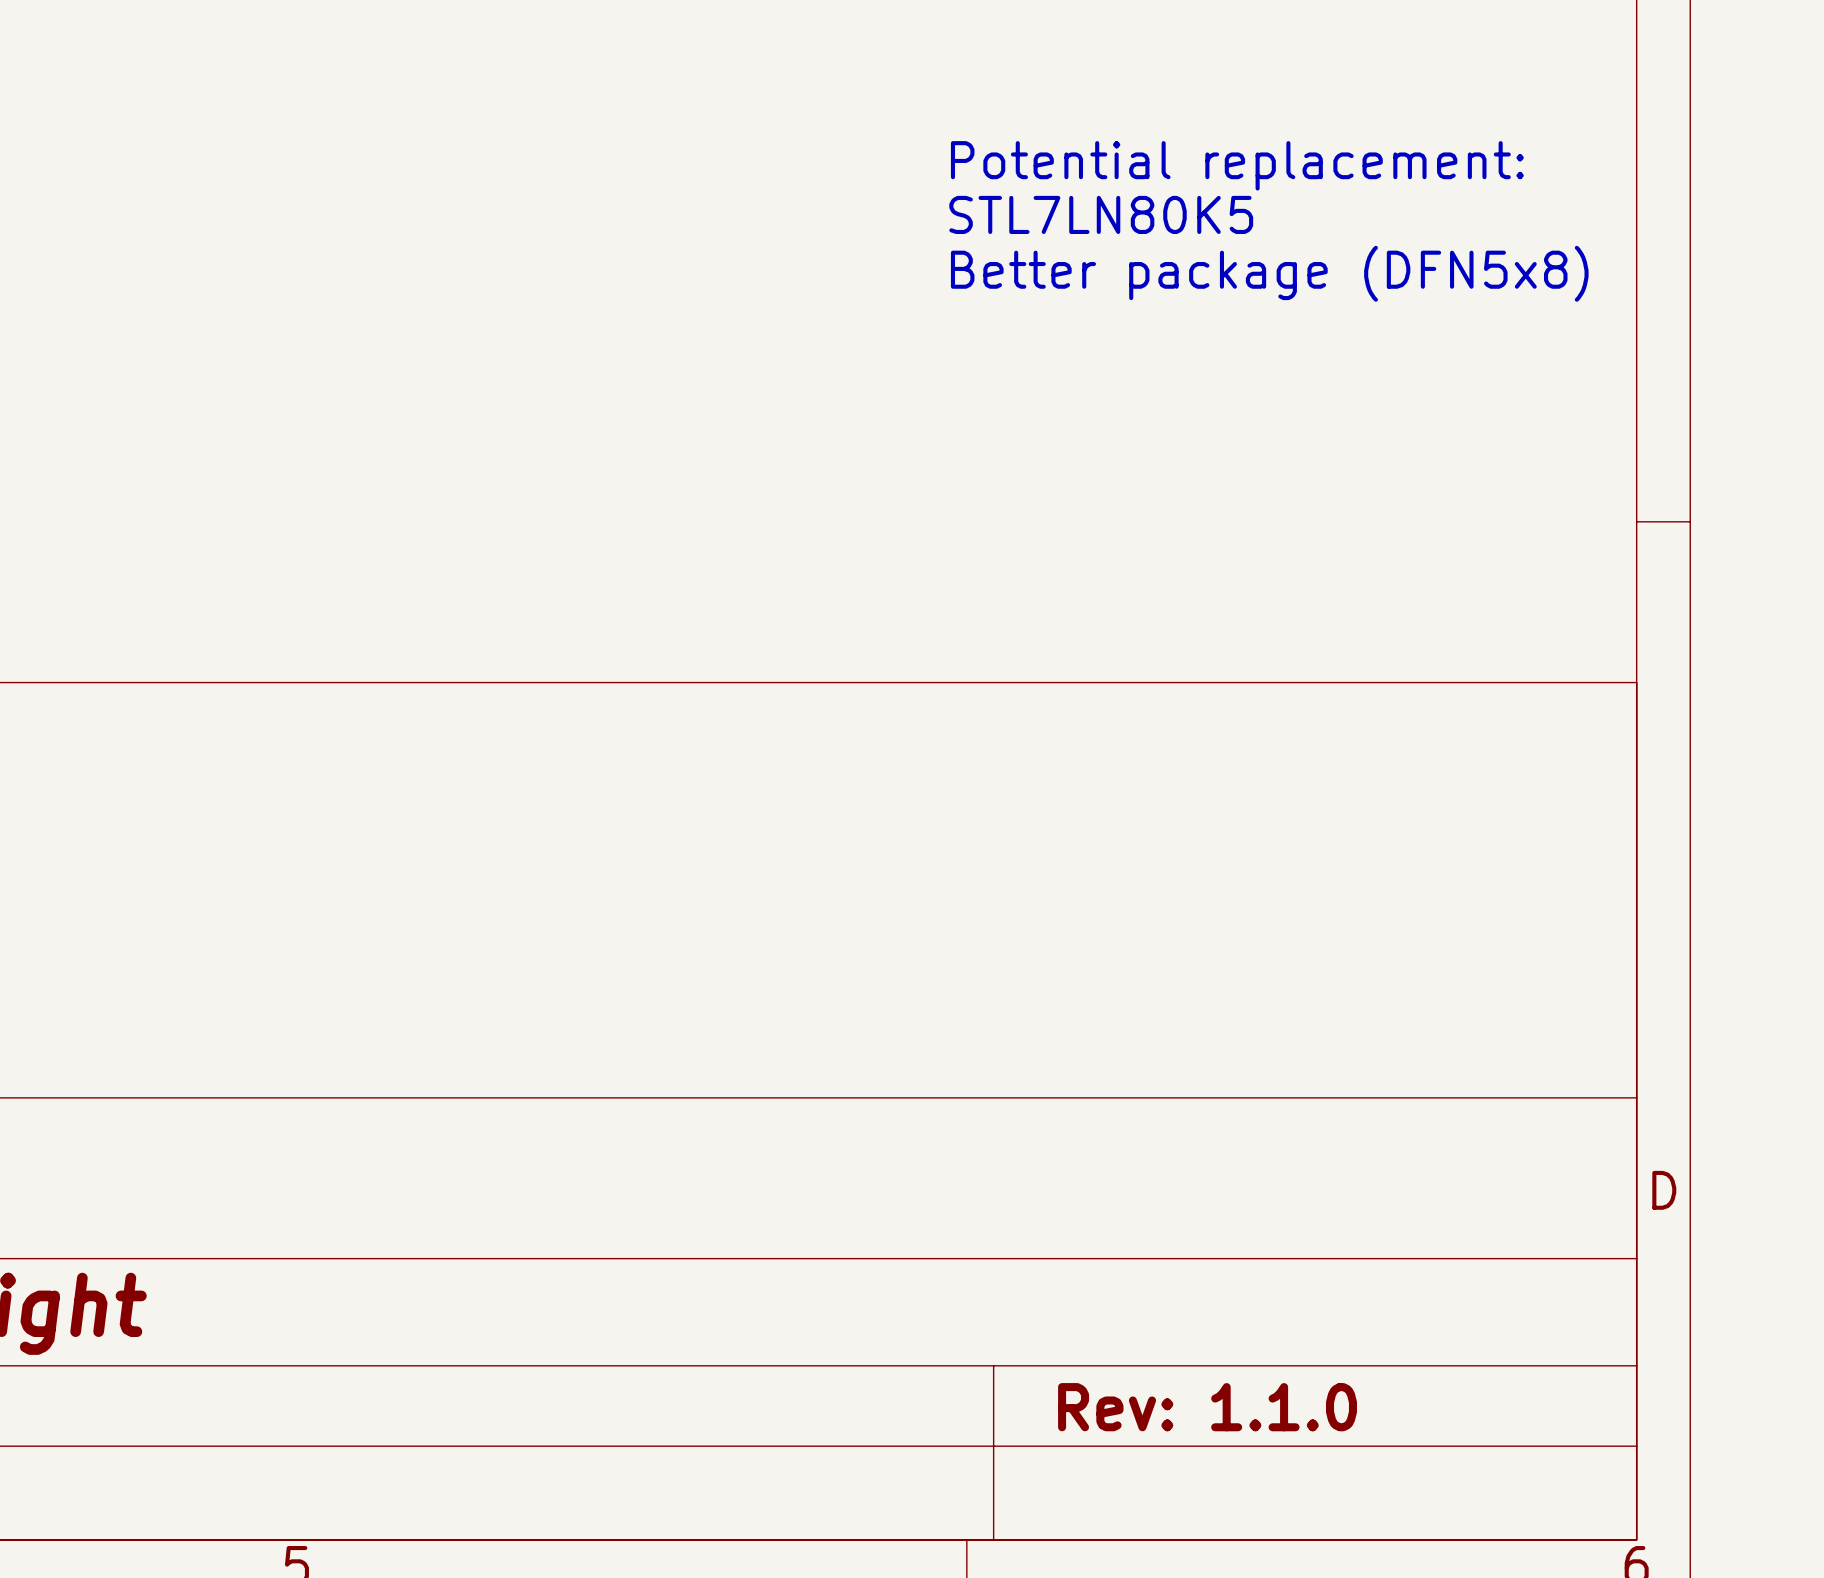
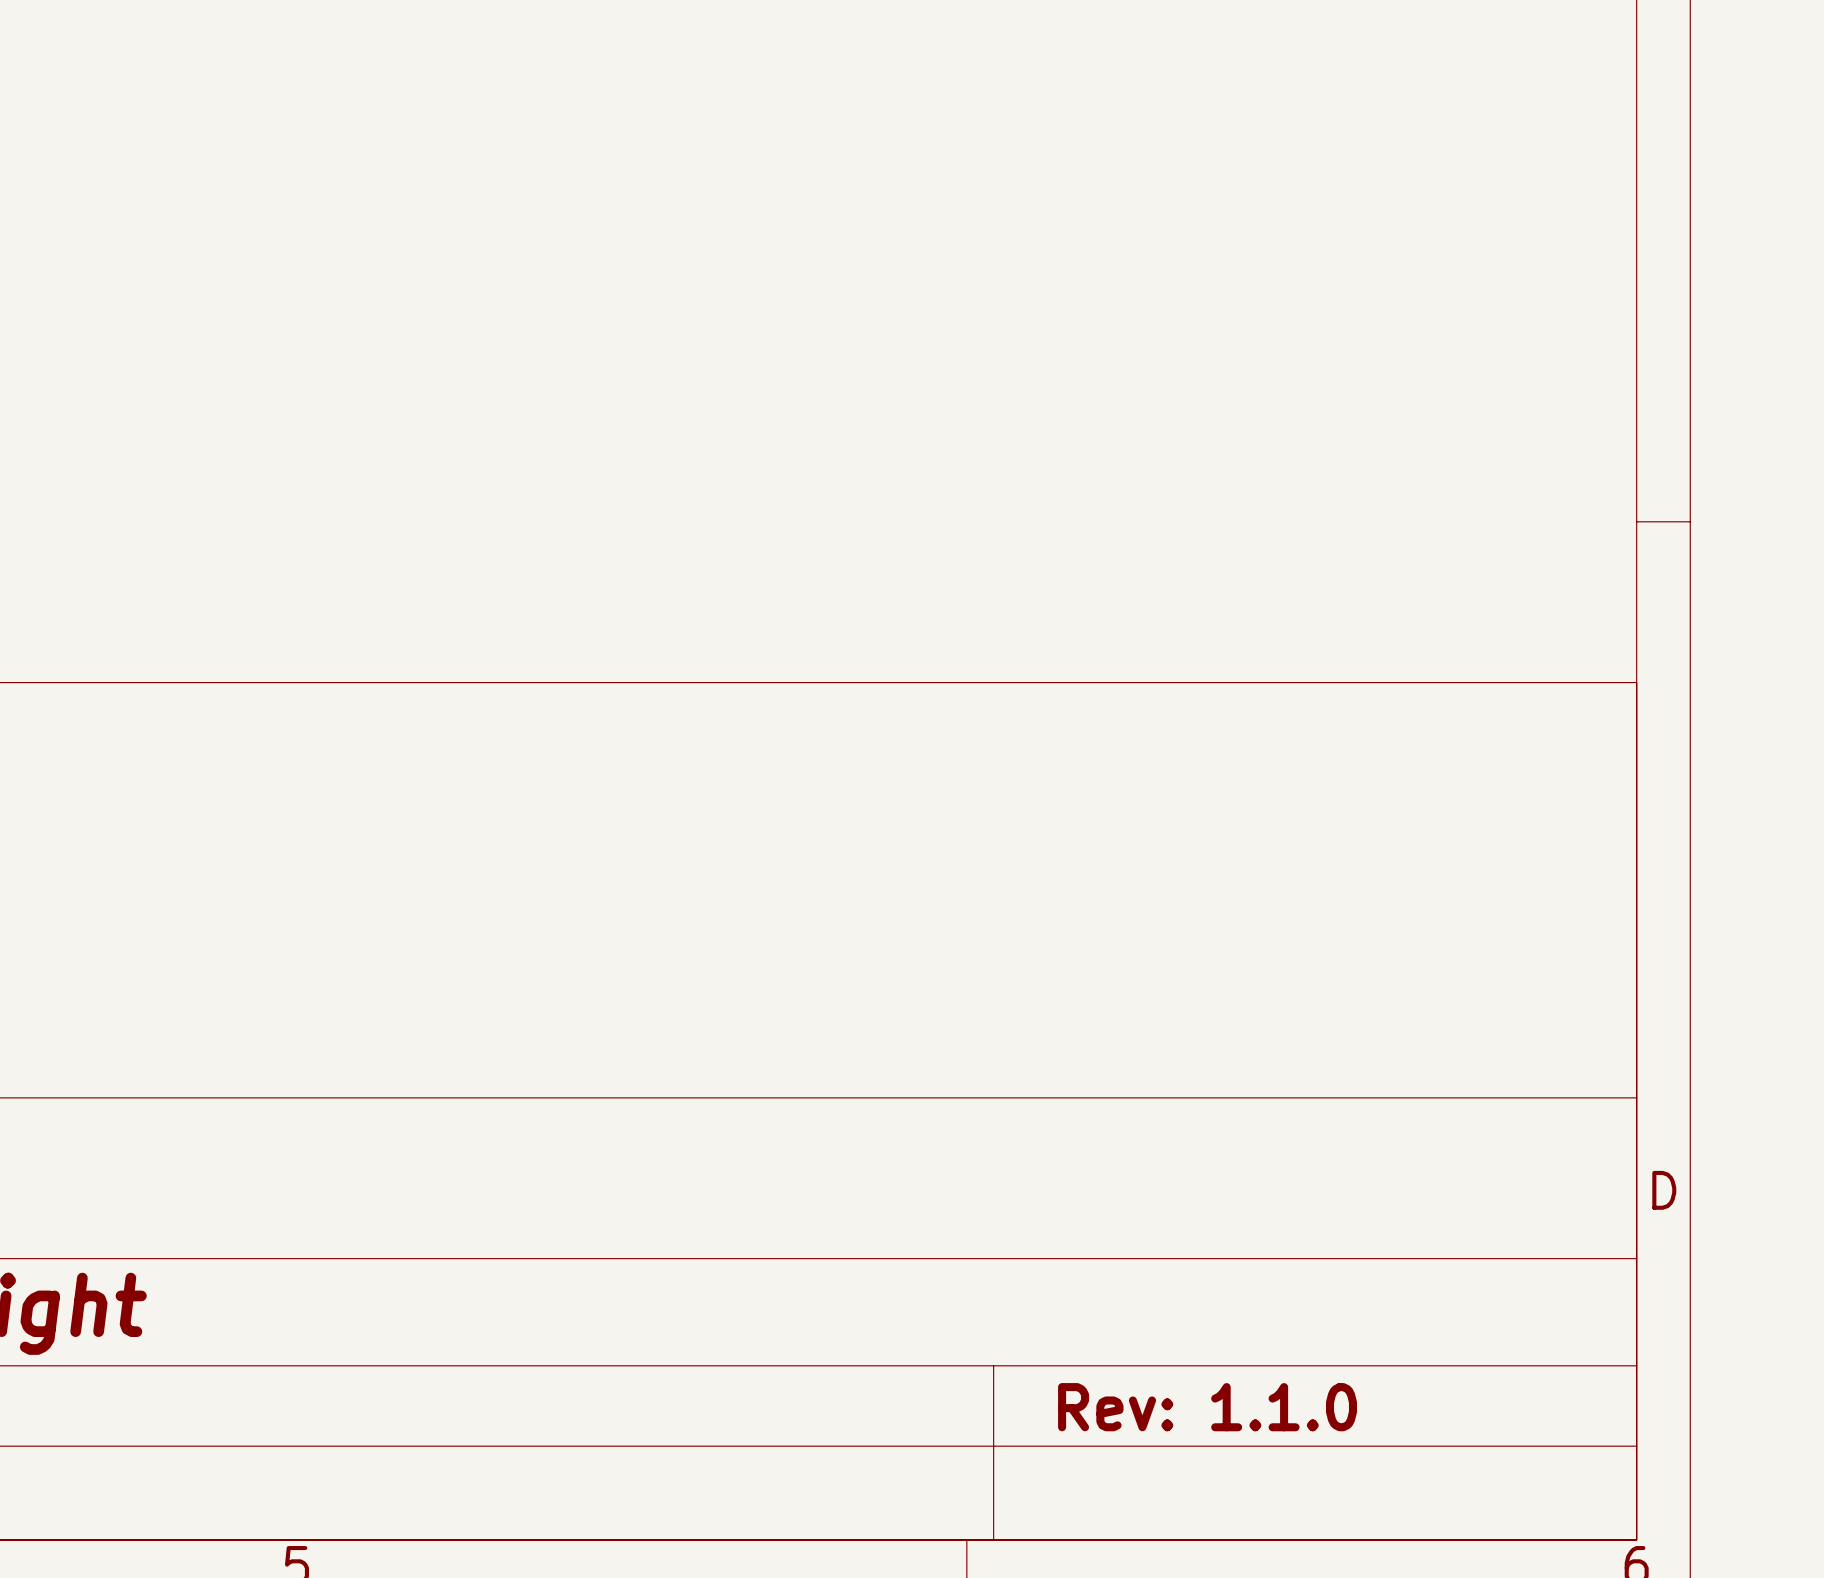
text: Potential replacement: (1237, 165) -> none
text: STL7LN80K5 (1101, 214) -> none
text: Better package (DFN5x8) (1269, 273) -> none

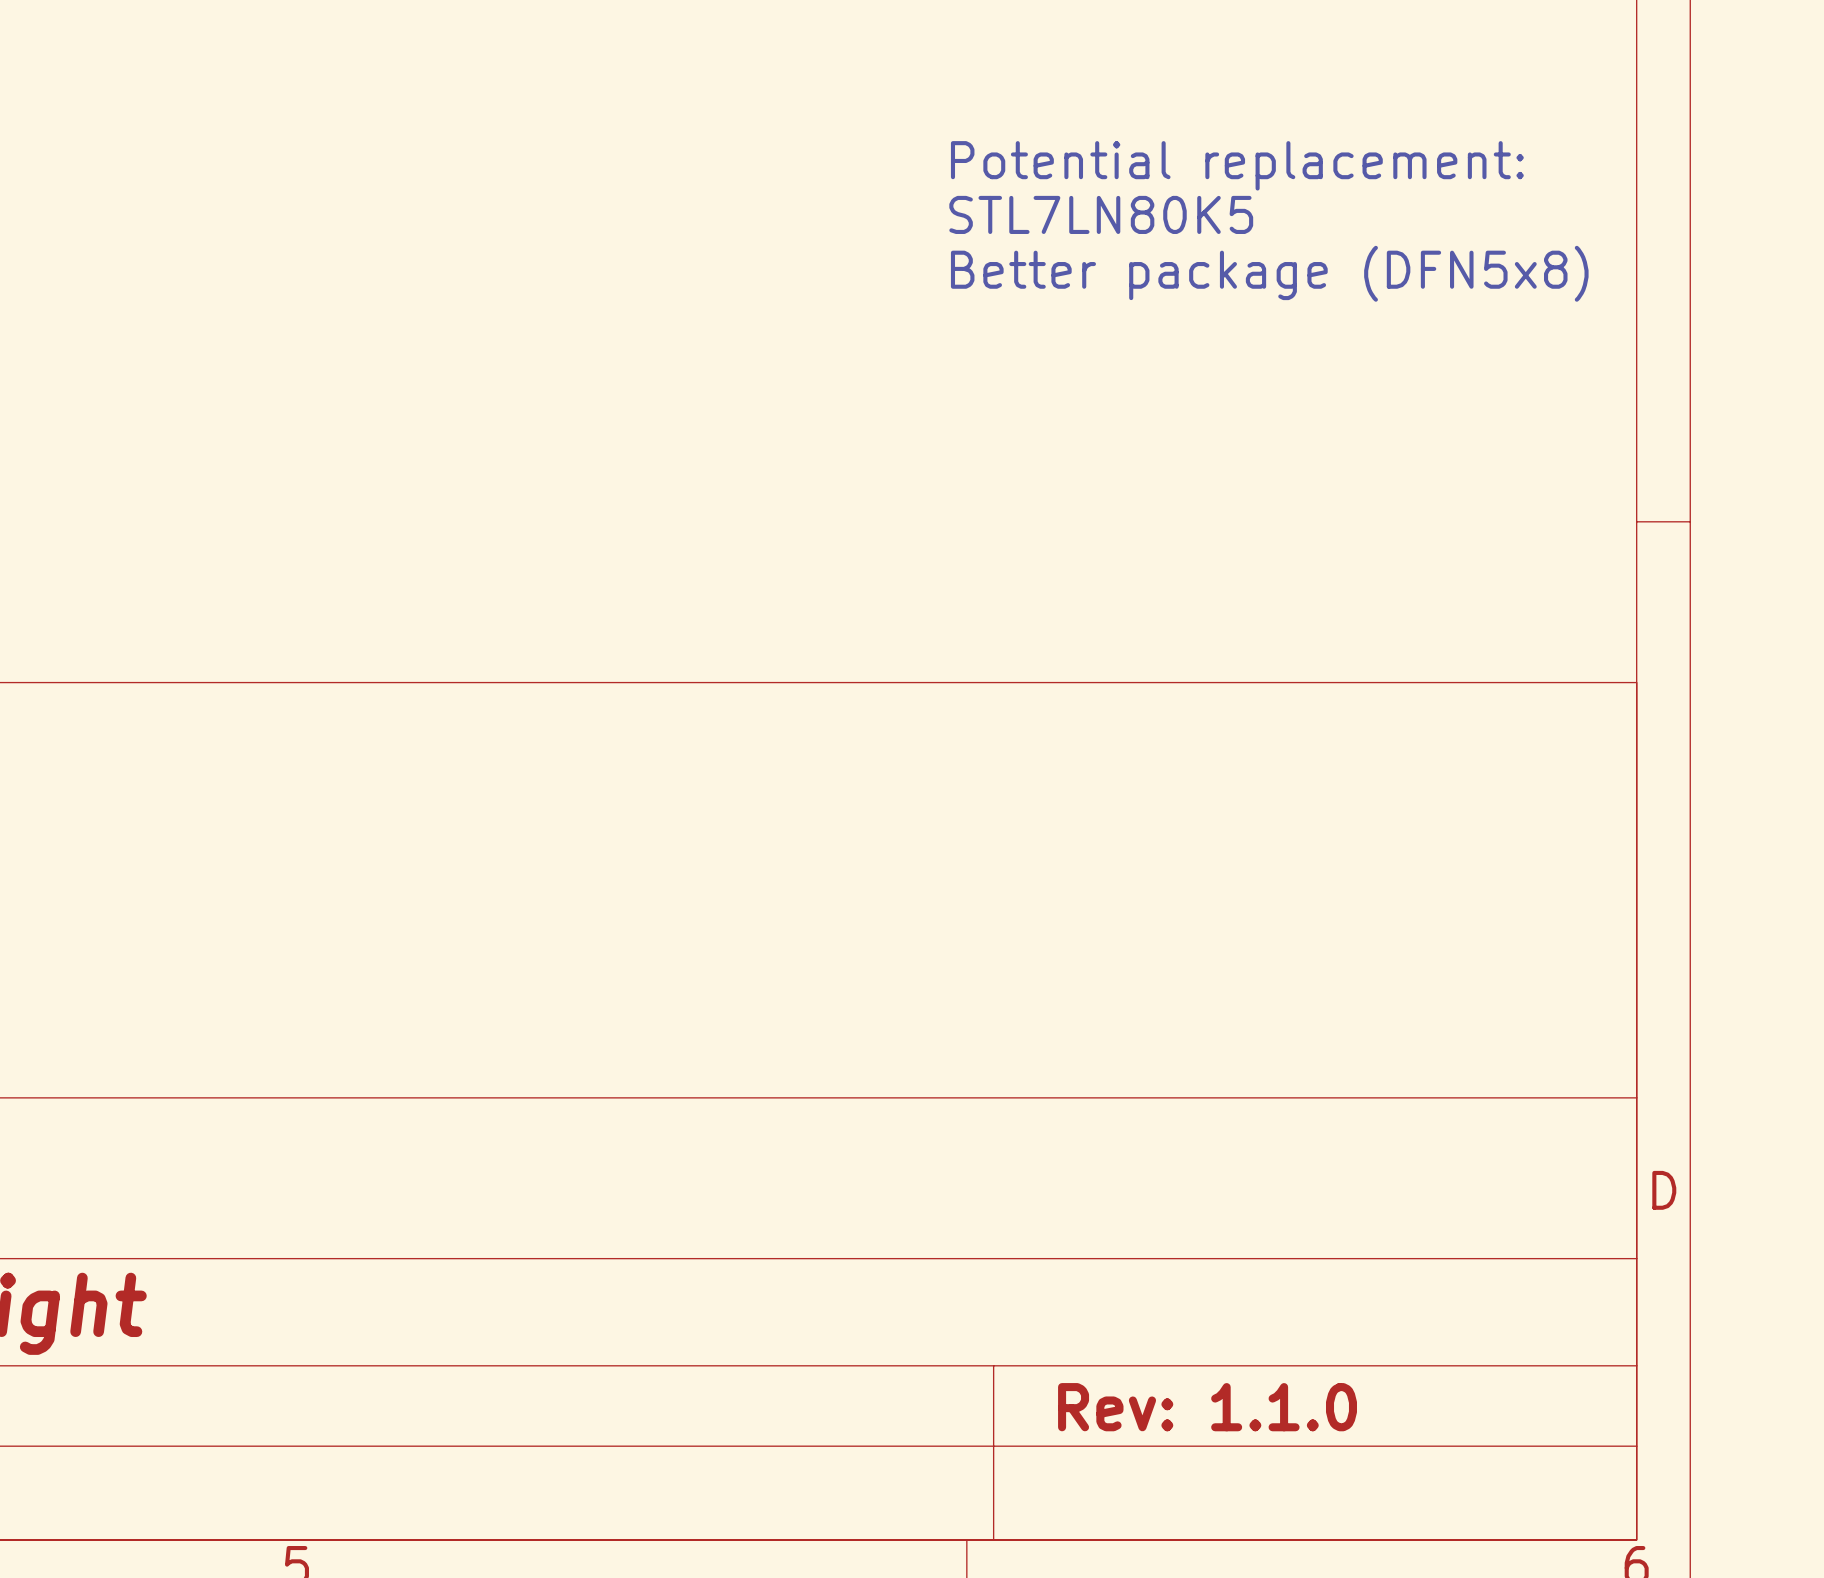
text: none -> Potential replacement: (1237, 165)
text: none -> STL7LN80K5 (1101, 214)
text: none -> Better package (DFN5x8) (1269, 273)

